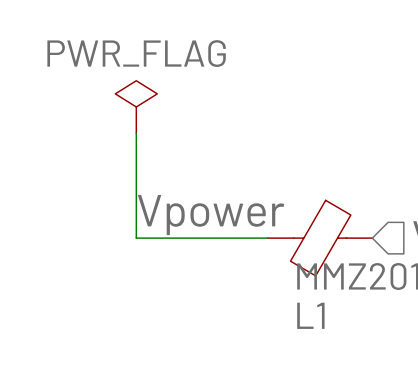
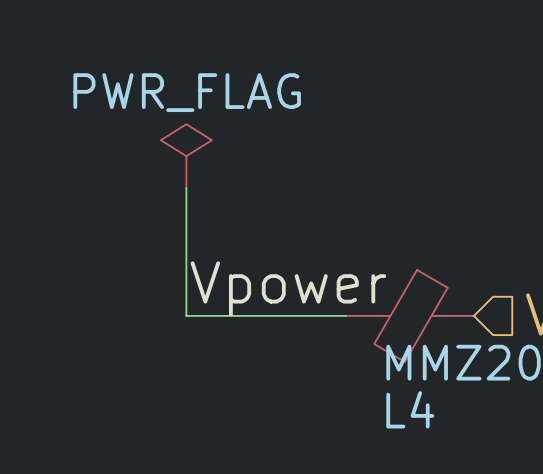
L1 name: L1 (310, 315) -> L4 (410, 409)

